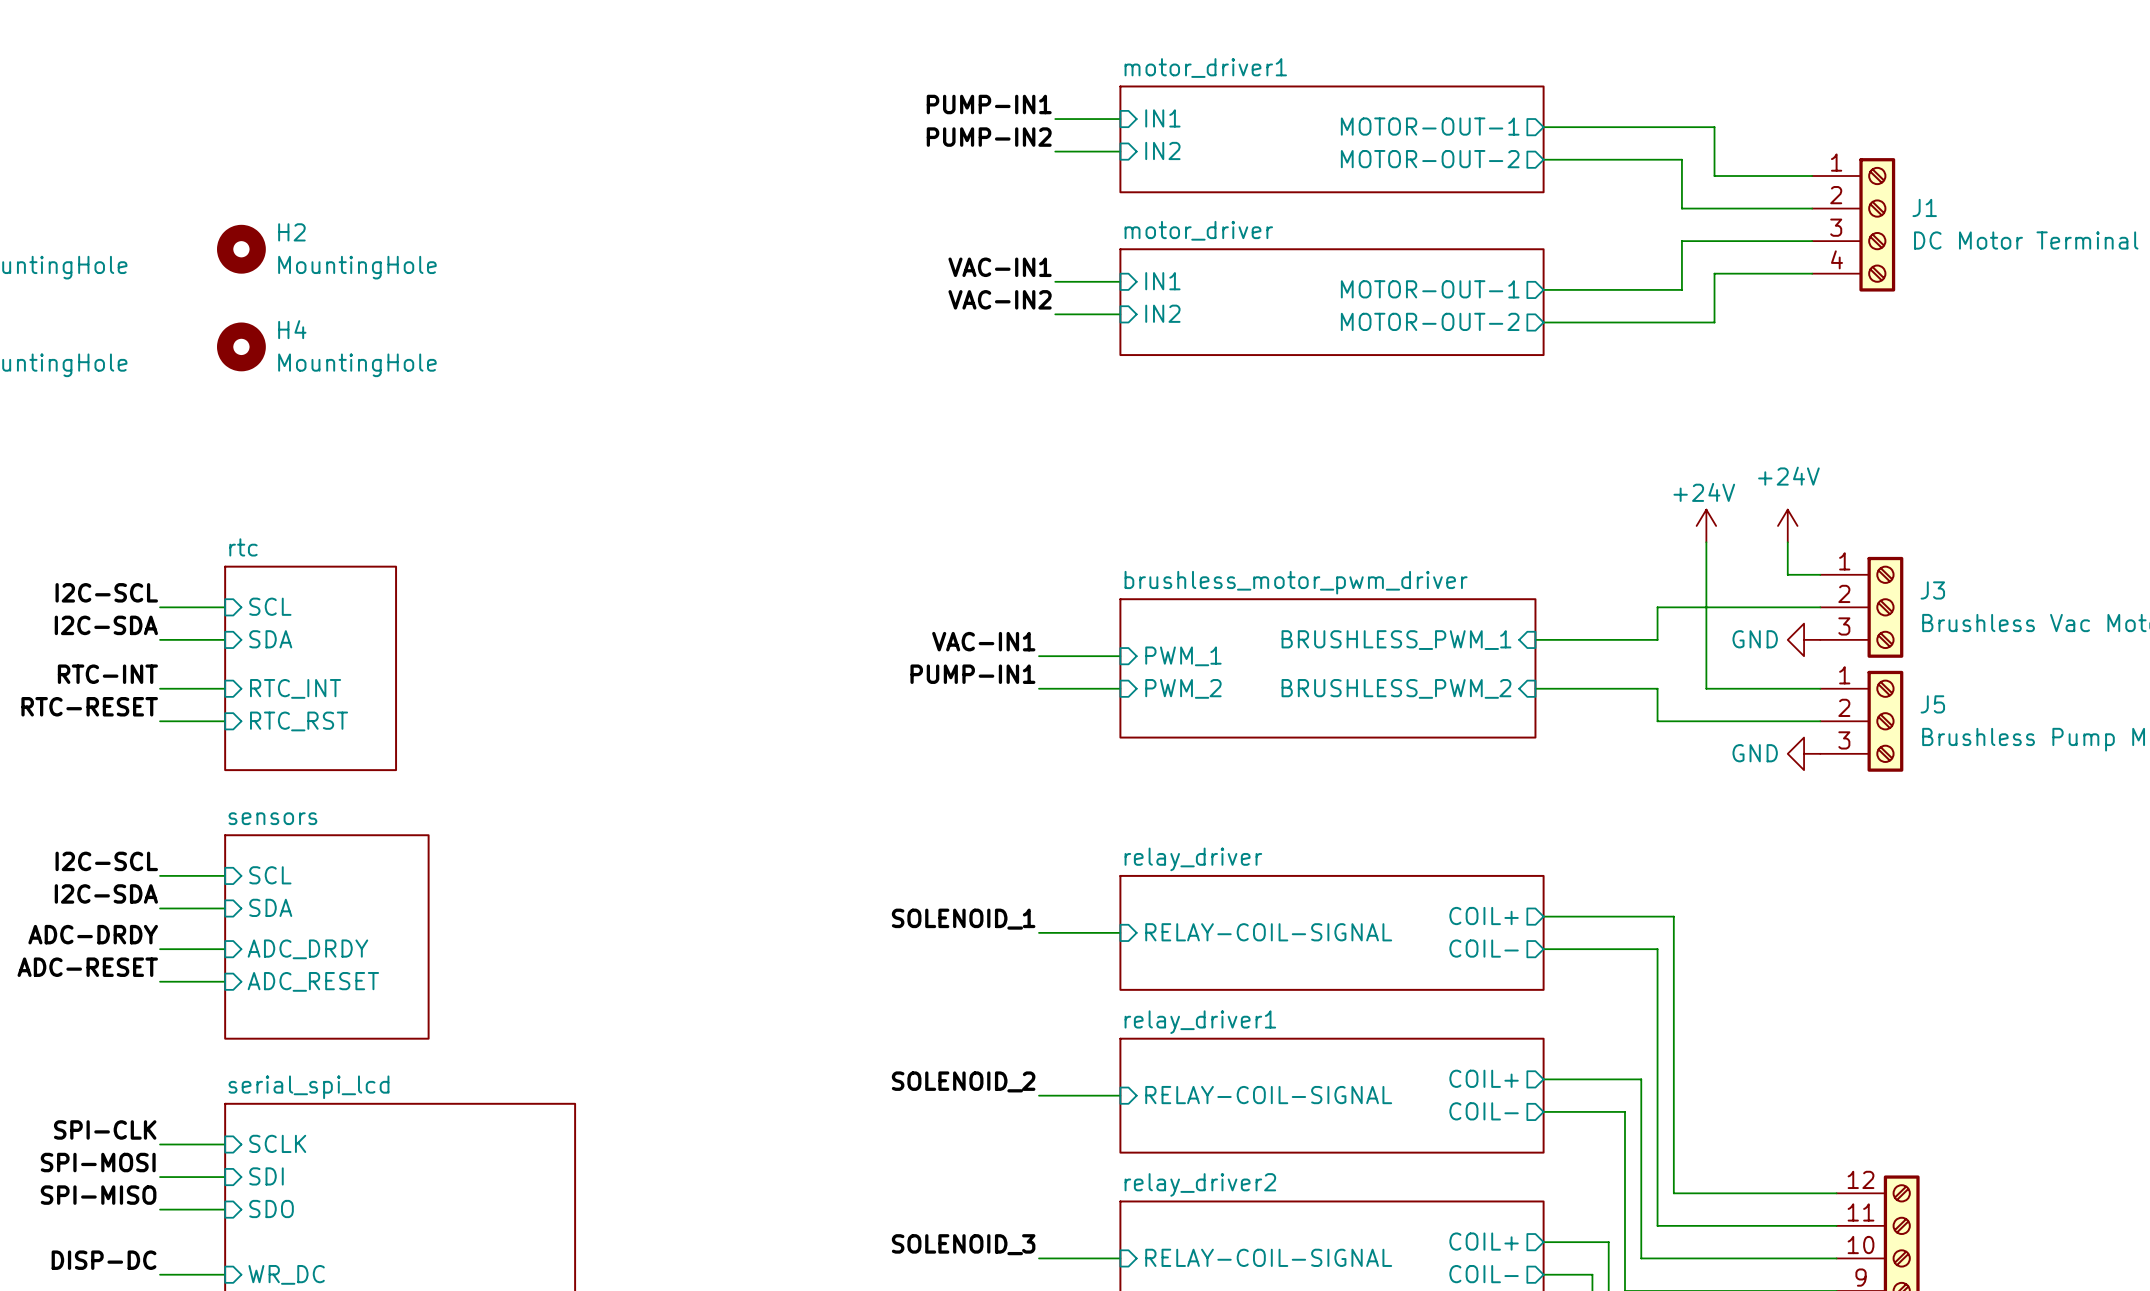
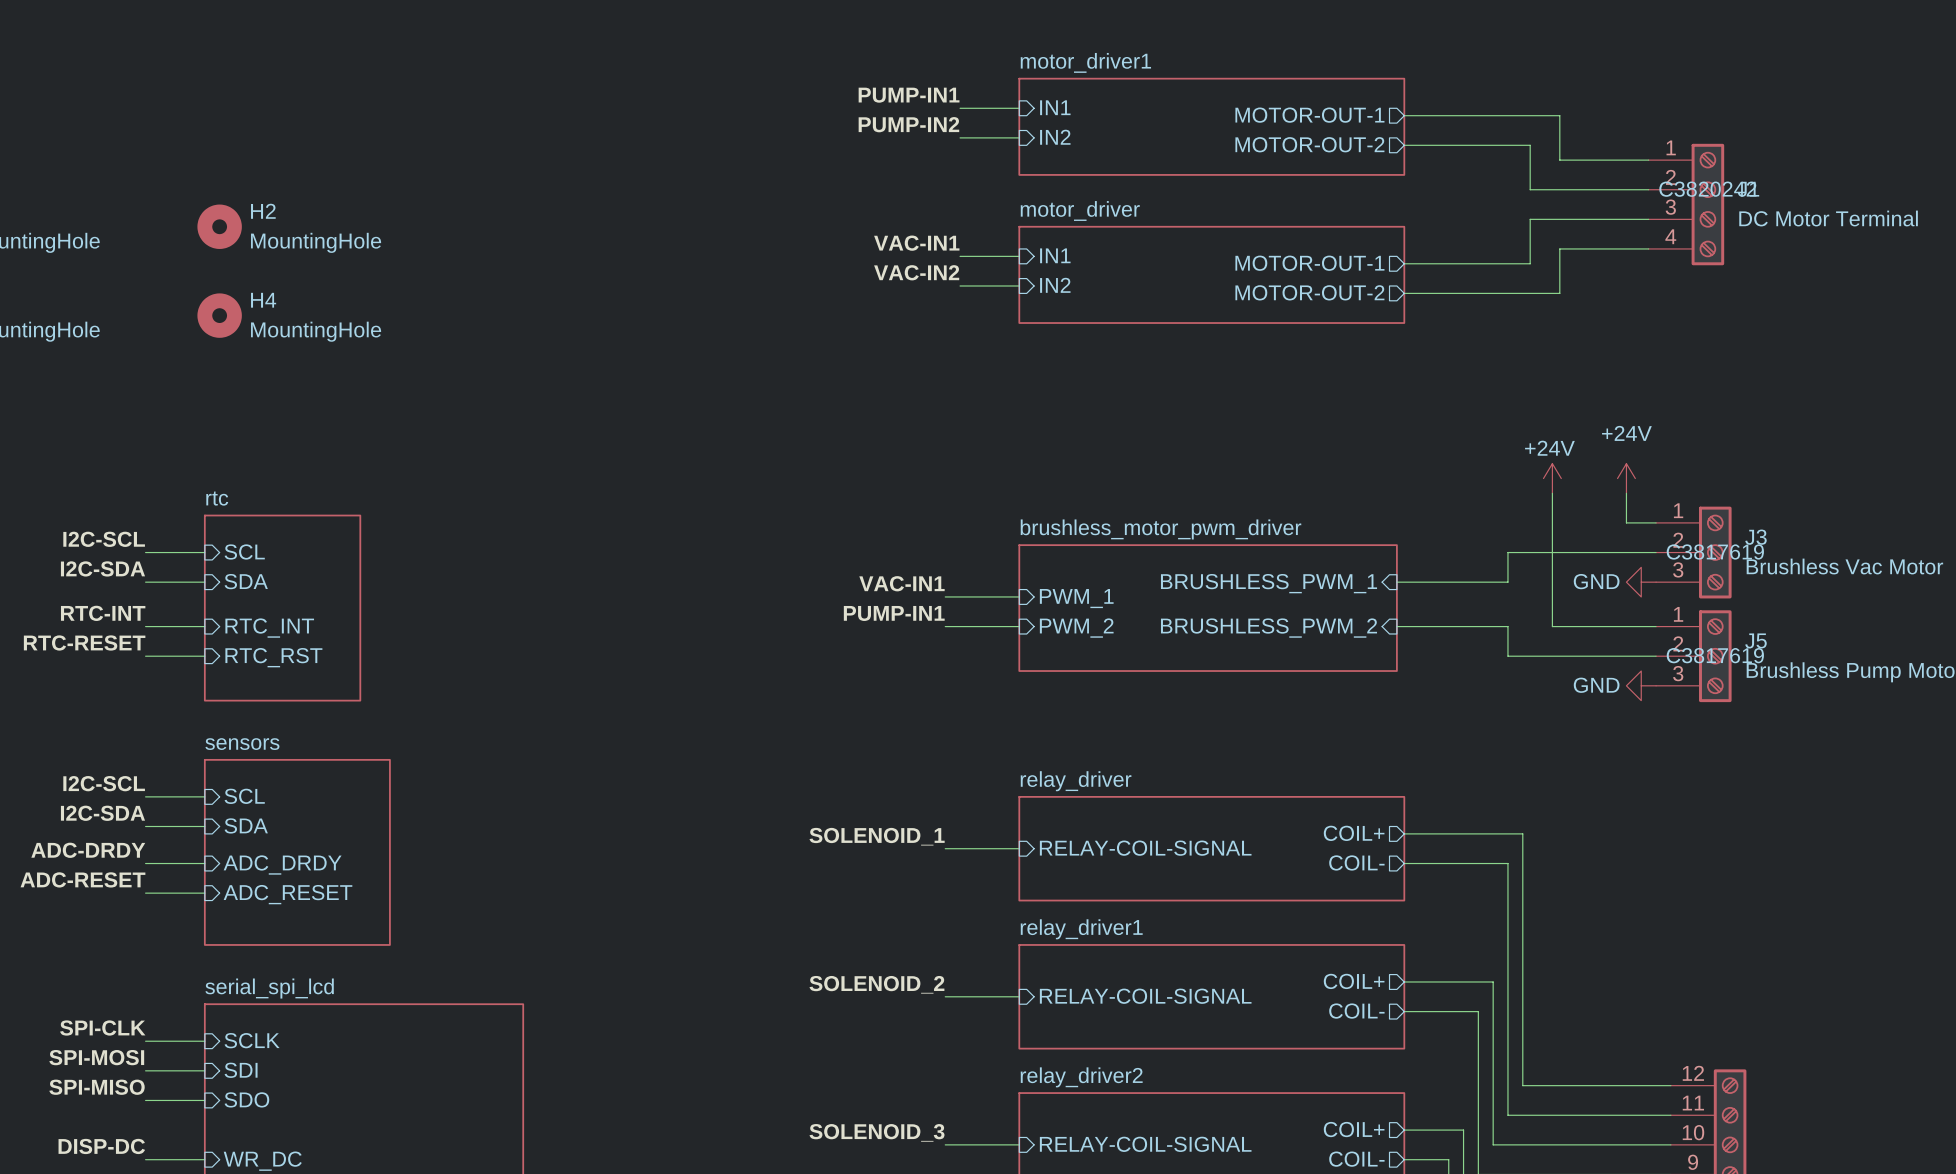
J1 text: none -> C3820242 (1707, 189)
J3 text: none -> C3817619 (1715, 551)
J5 text: none -> C3817619 (1715, 655)

